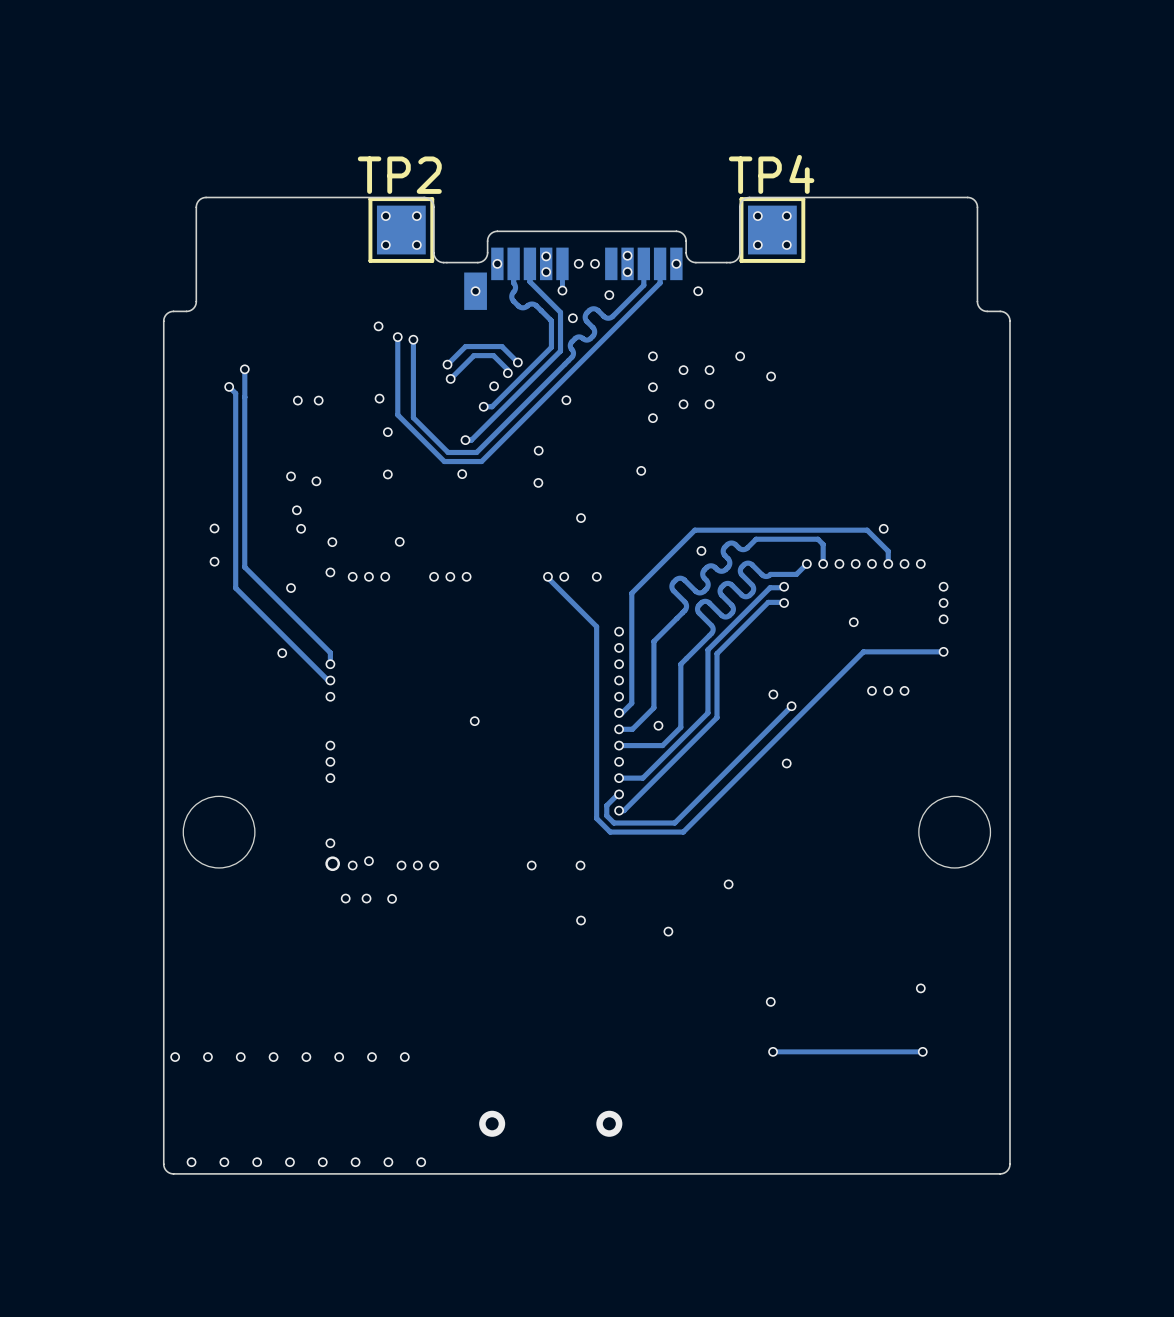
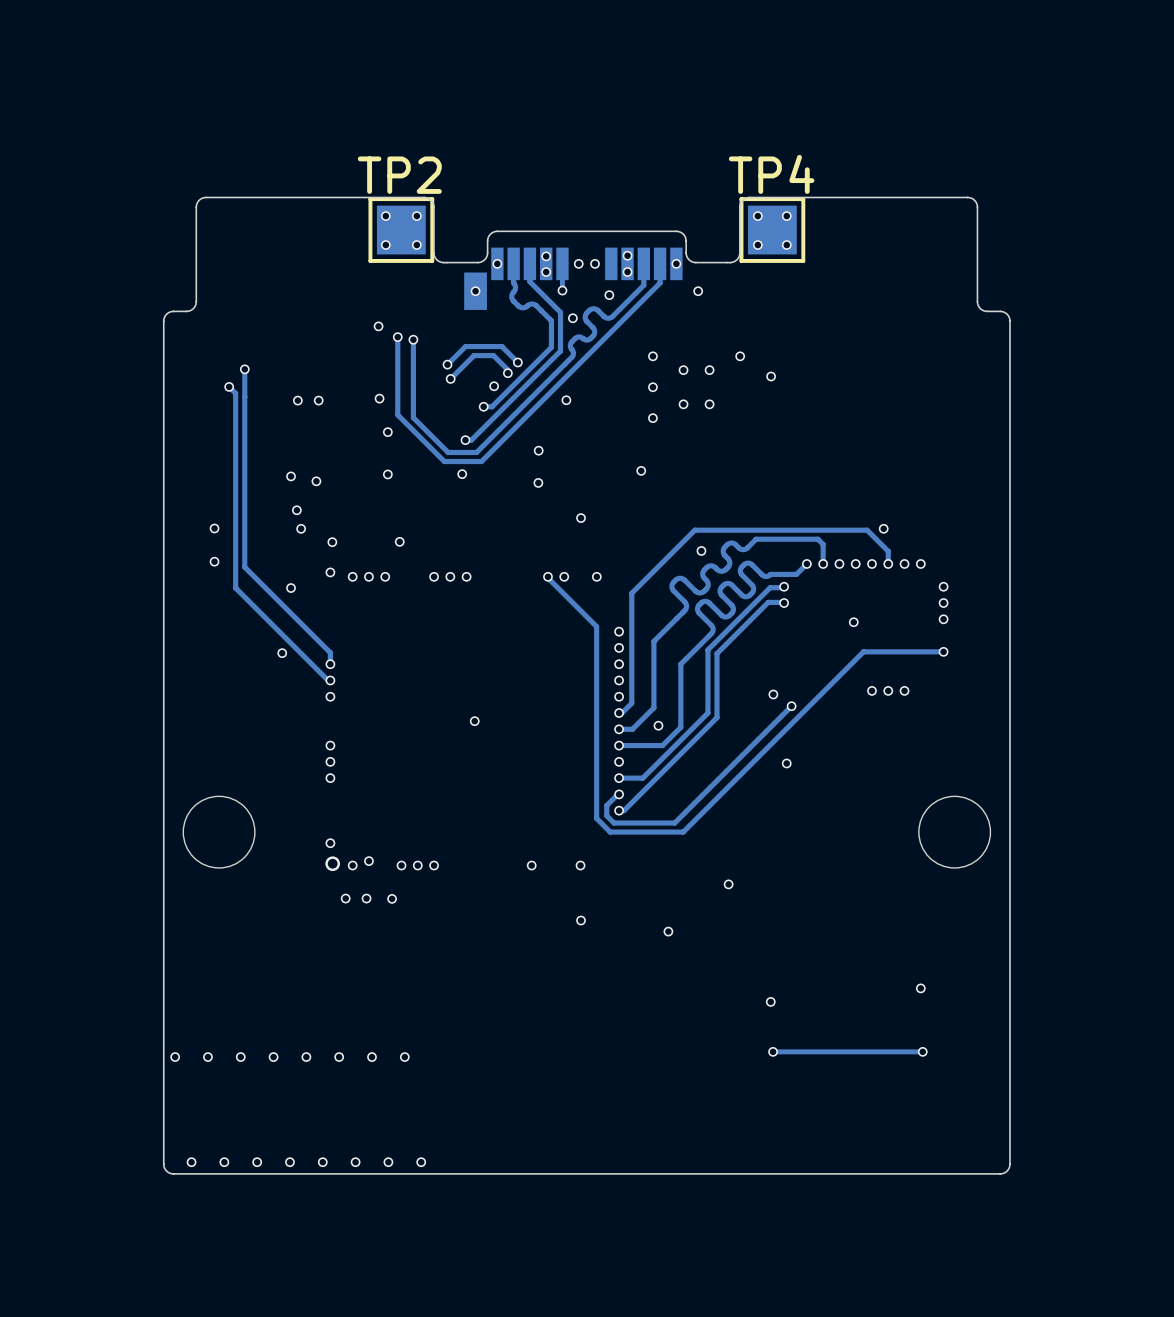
via: (492, 1123) -> none
via: (609, 1123) -> none

